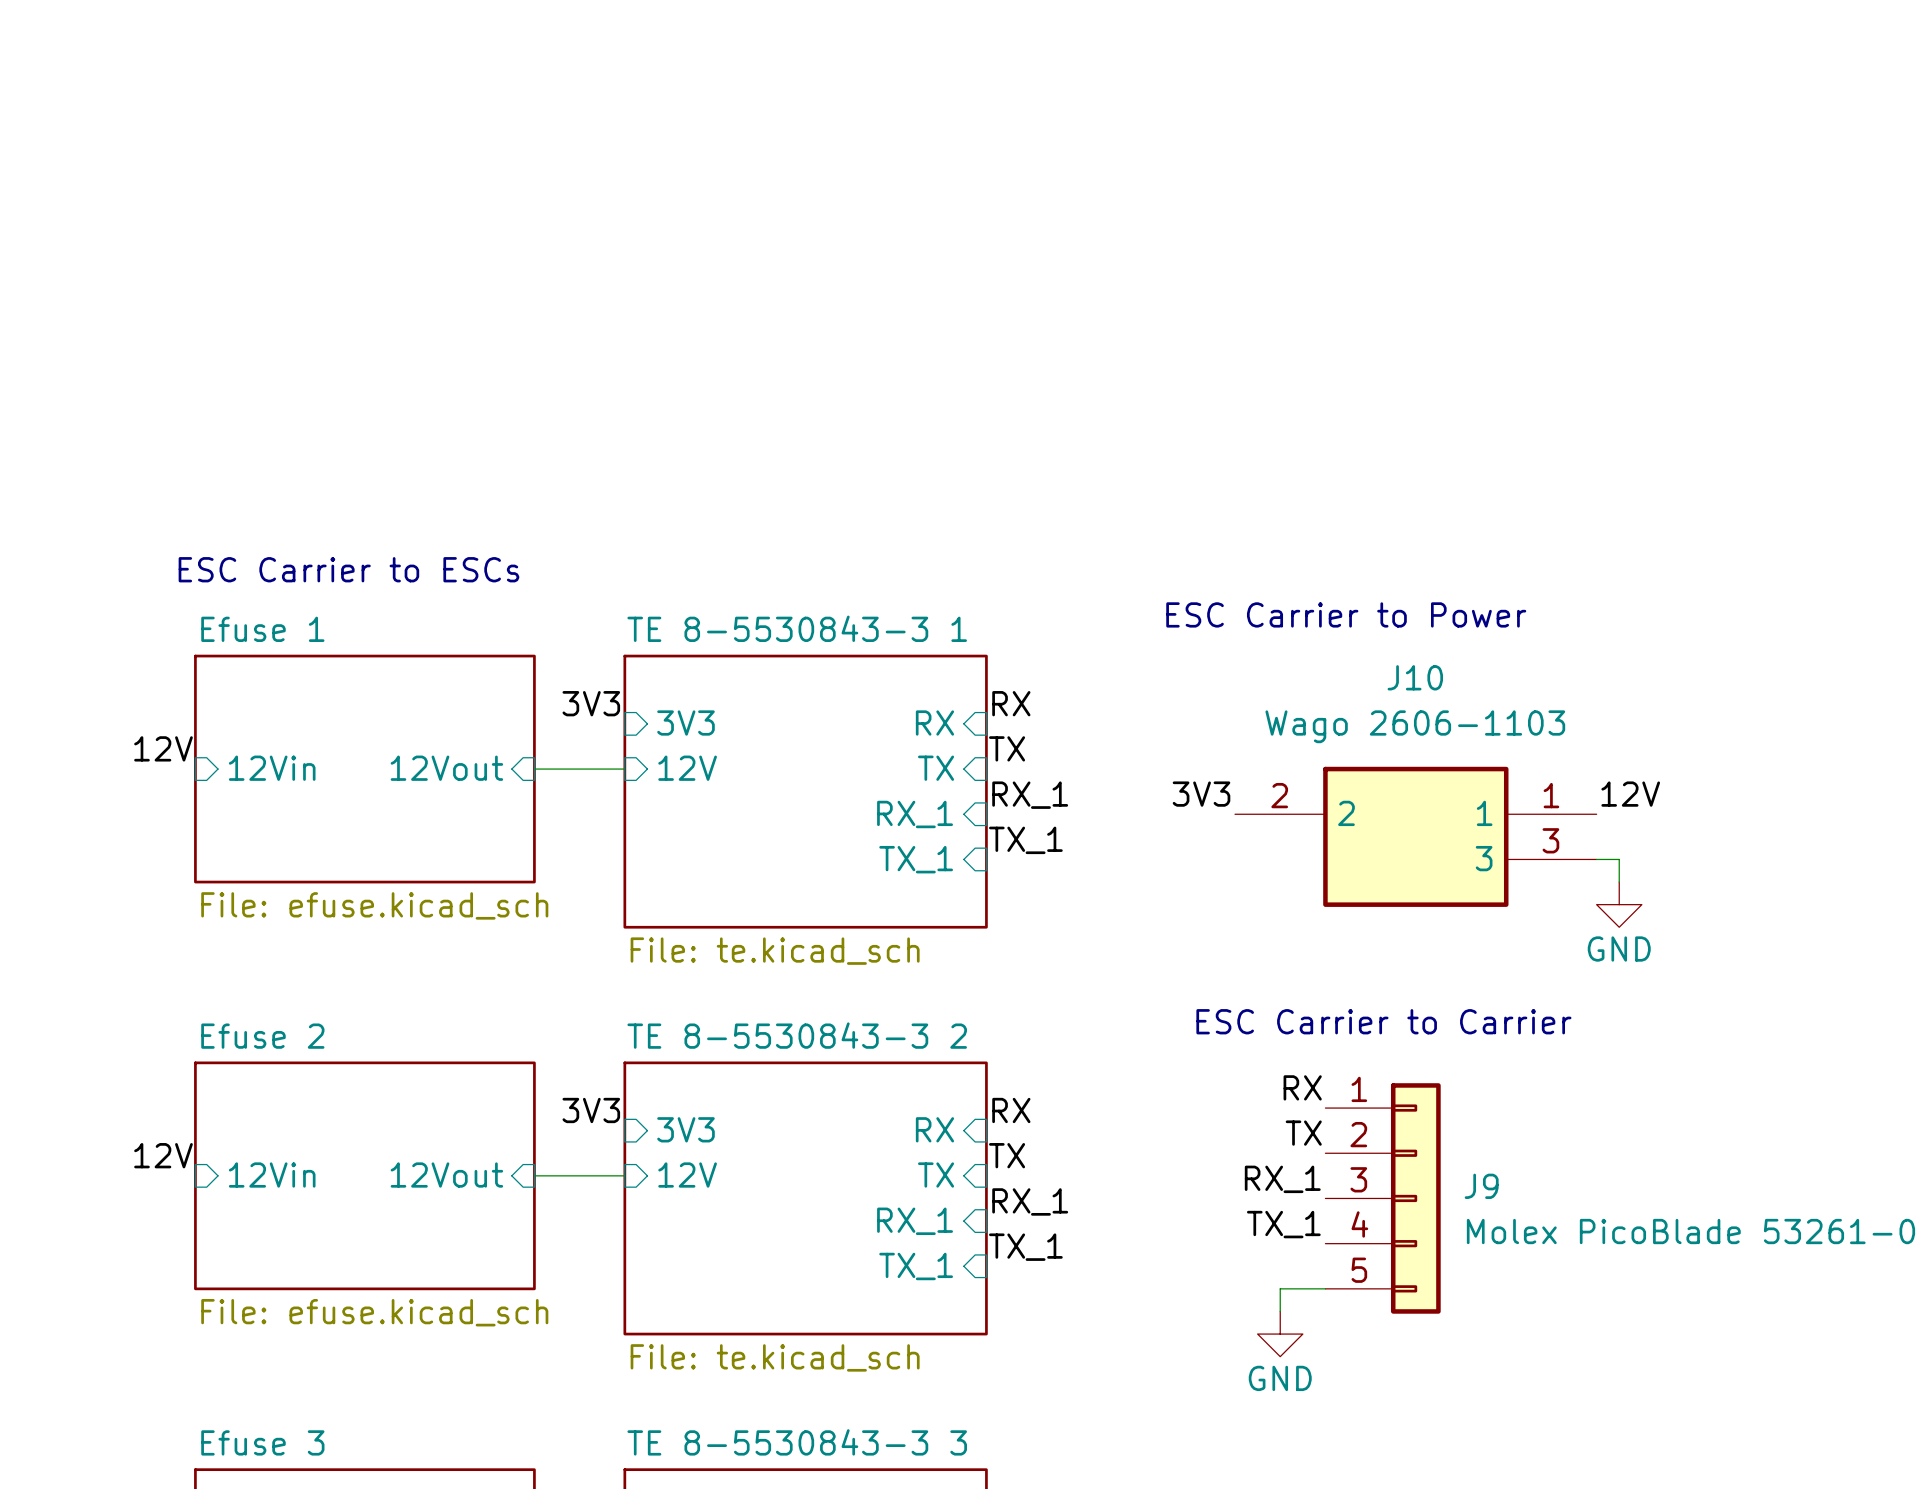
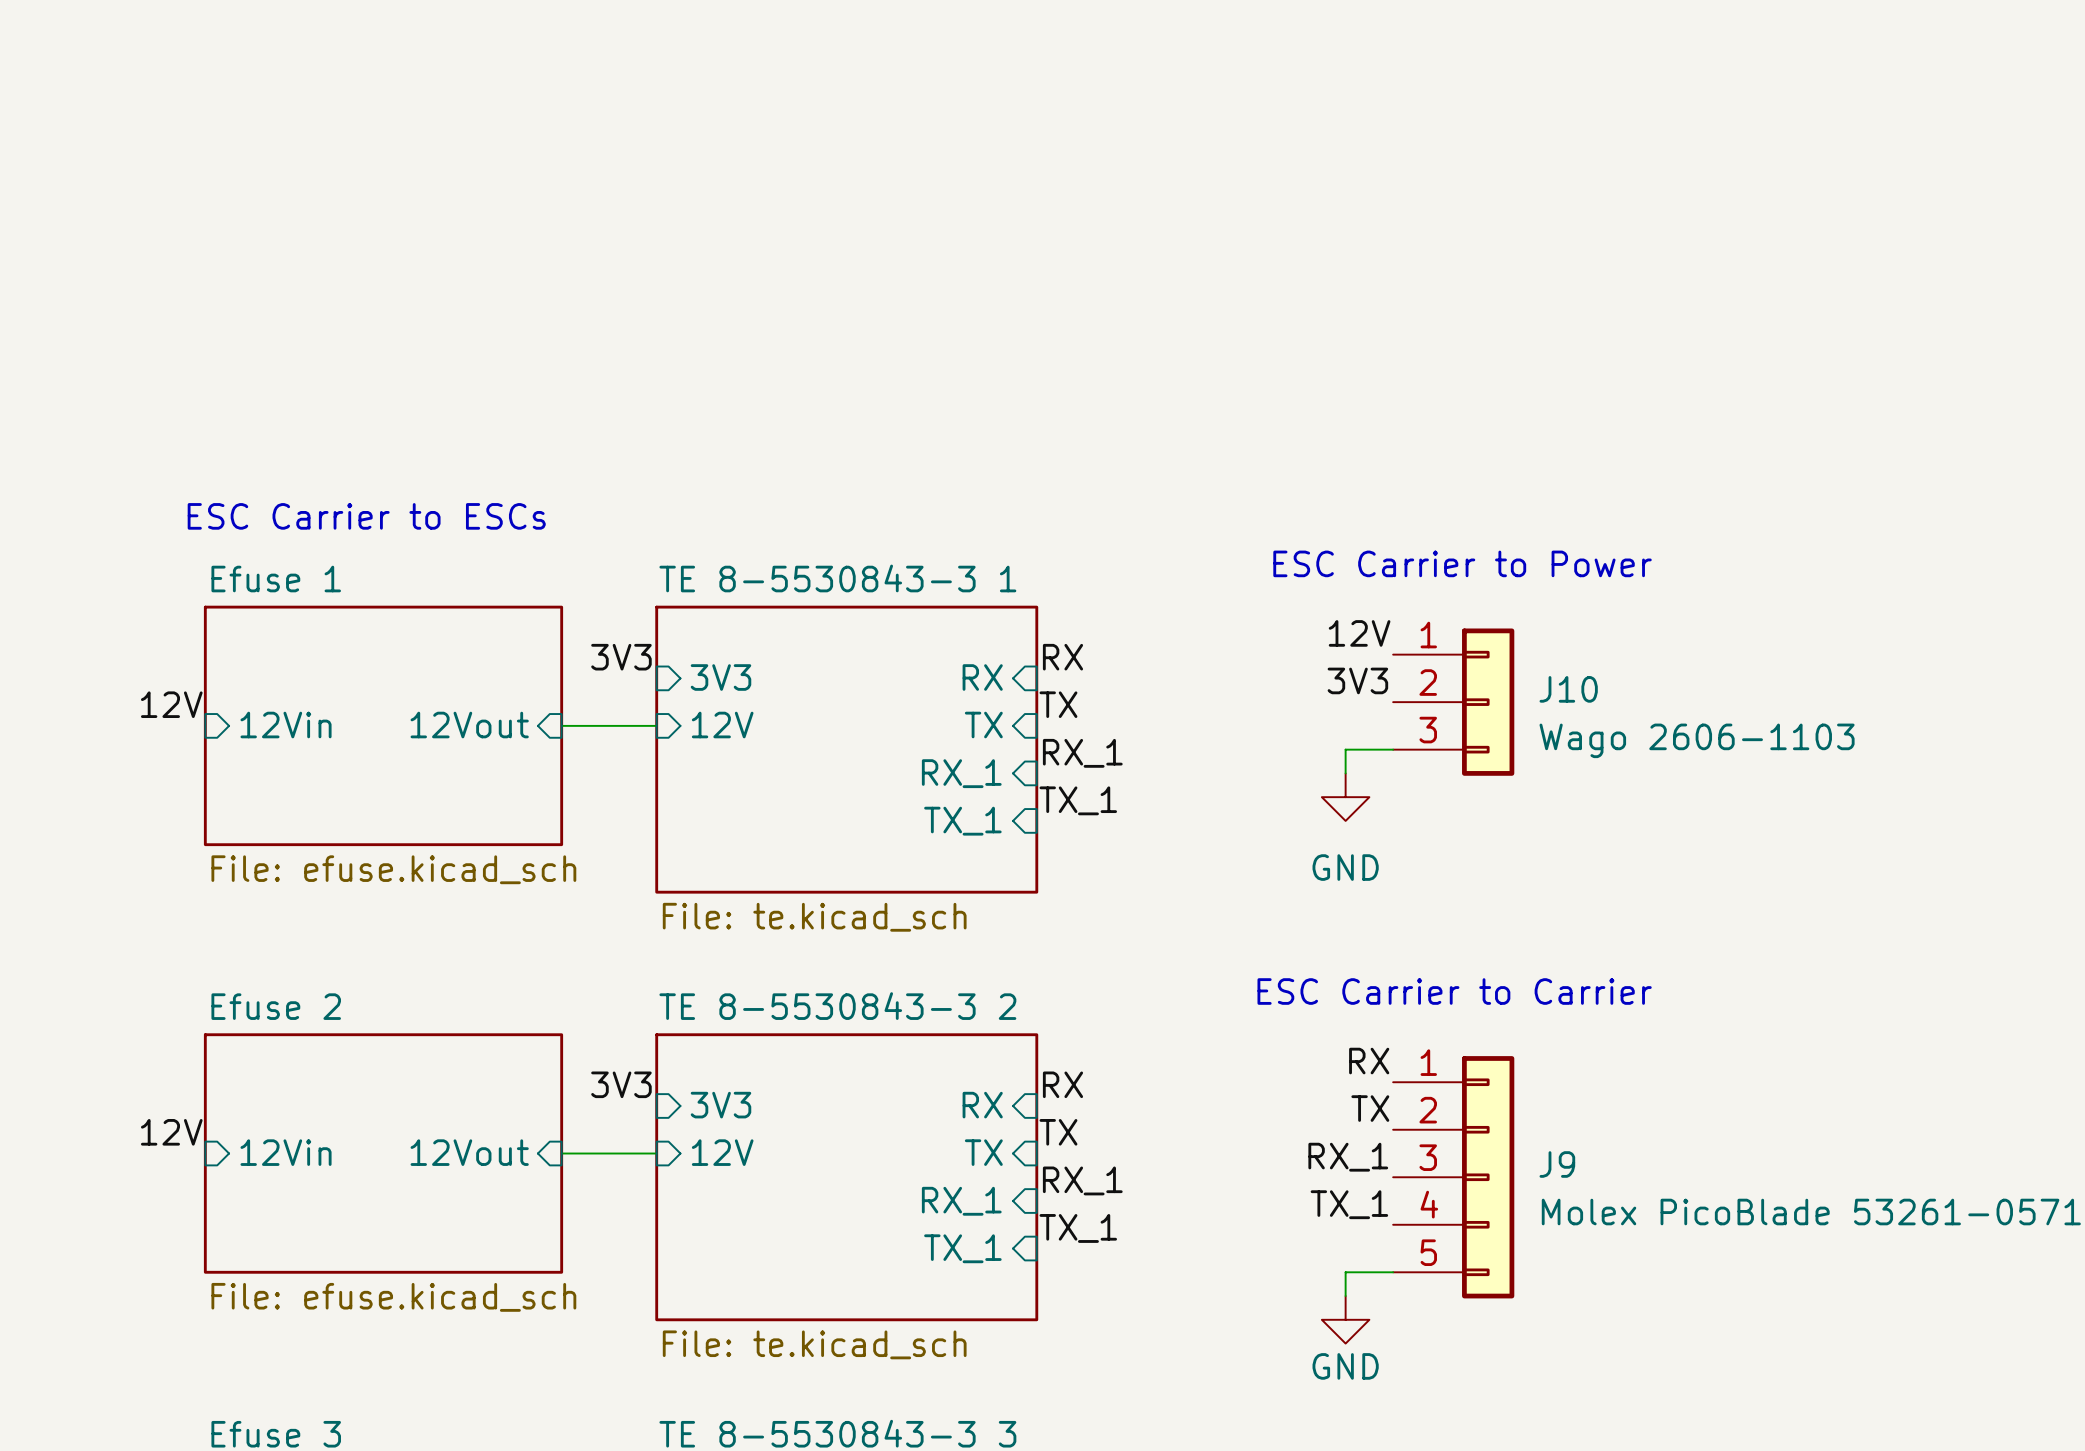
text position: ESC Carrier to Power (1346, 614) -> ESC Carrier to Power (1462, 563)
J10 name position: J10 (1415, 677) -> J10 (1568, 689)
J10 value position: Wago 2606-1103 (1415, 726) -> Wago 2606-1103 (1697, 740)
J10 symbol: [1235, 766, 1597, 907] -> [1393, 628, 1515, 776]
wire: none -> (1393, 749) (1345, 749) (1345, 773)
label position: 3V3 (1201, 794) -> 3V3 (1357, 680)
label position: 12V (1630, 794) -> 12V (1359, 633)
wire: (1596, 859) (1619, 859) (1619, 882) -> none
power symbol position: GND (1619, 904) -> GND (1345, 797)
power symbol text position: GND (1619, 949) -> GND (1345, 867)

